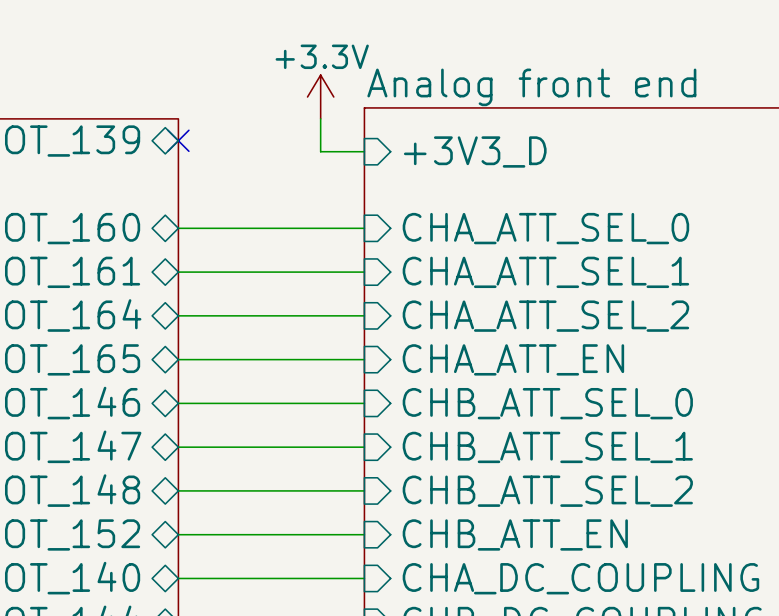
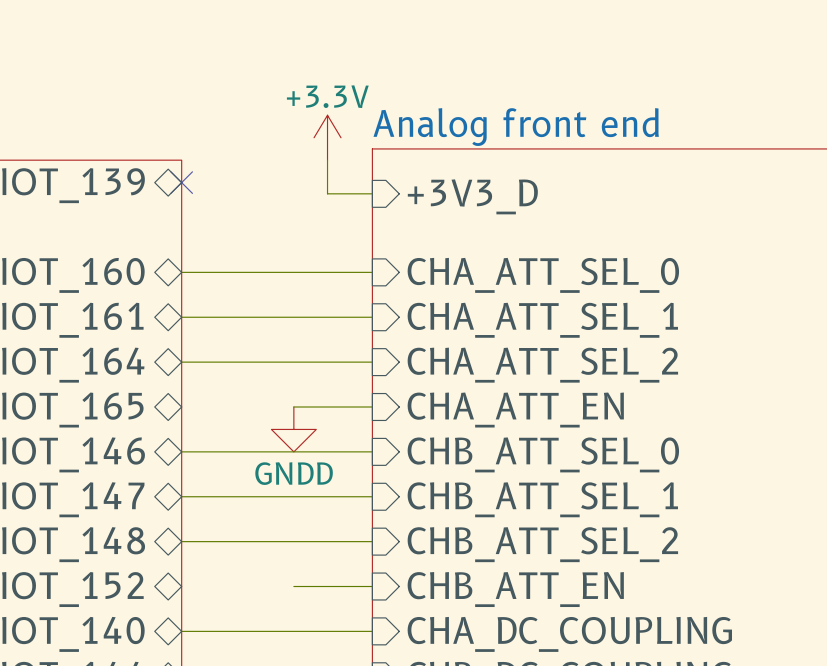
wire: (178, 359) (287, 359) -> none
power symbol: none -> GNDD (293, 429)
wire: (178, 534) (287, 534) -> none

